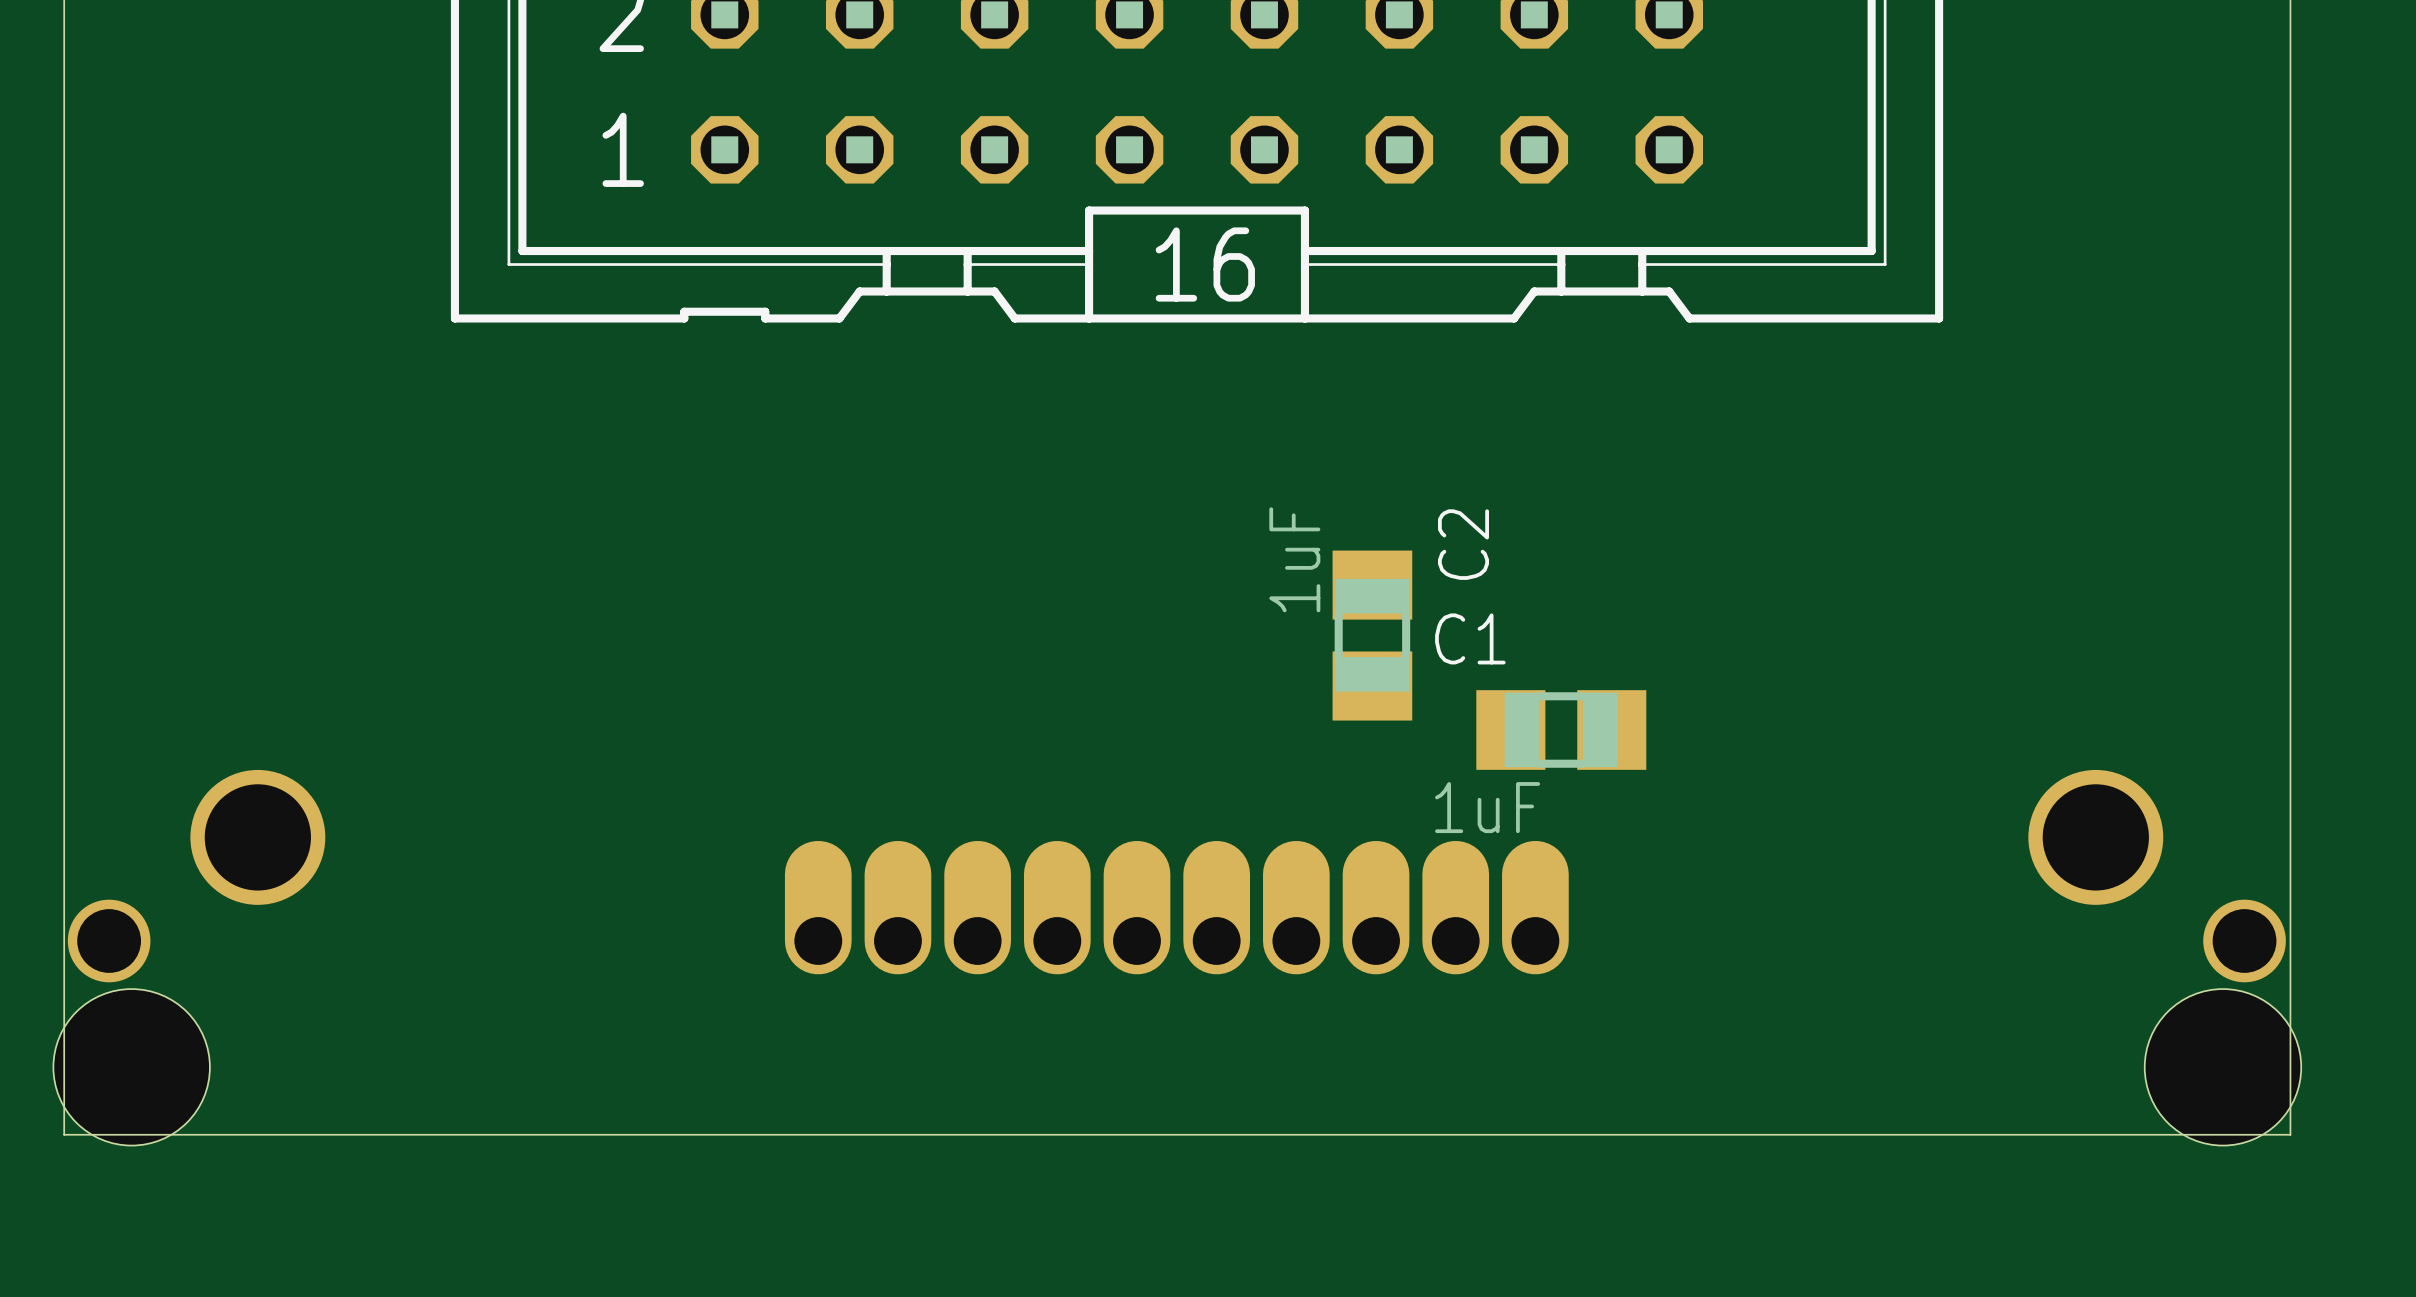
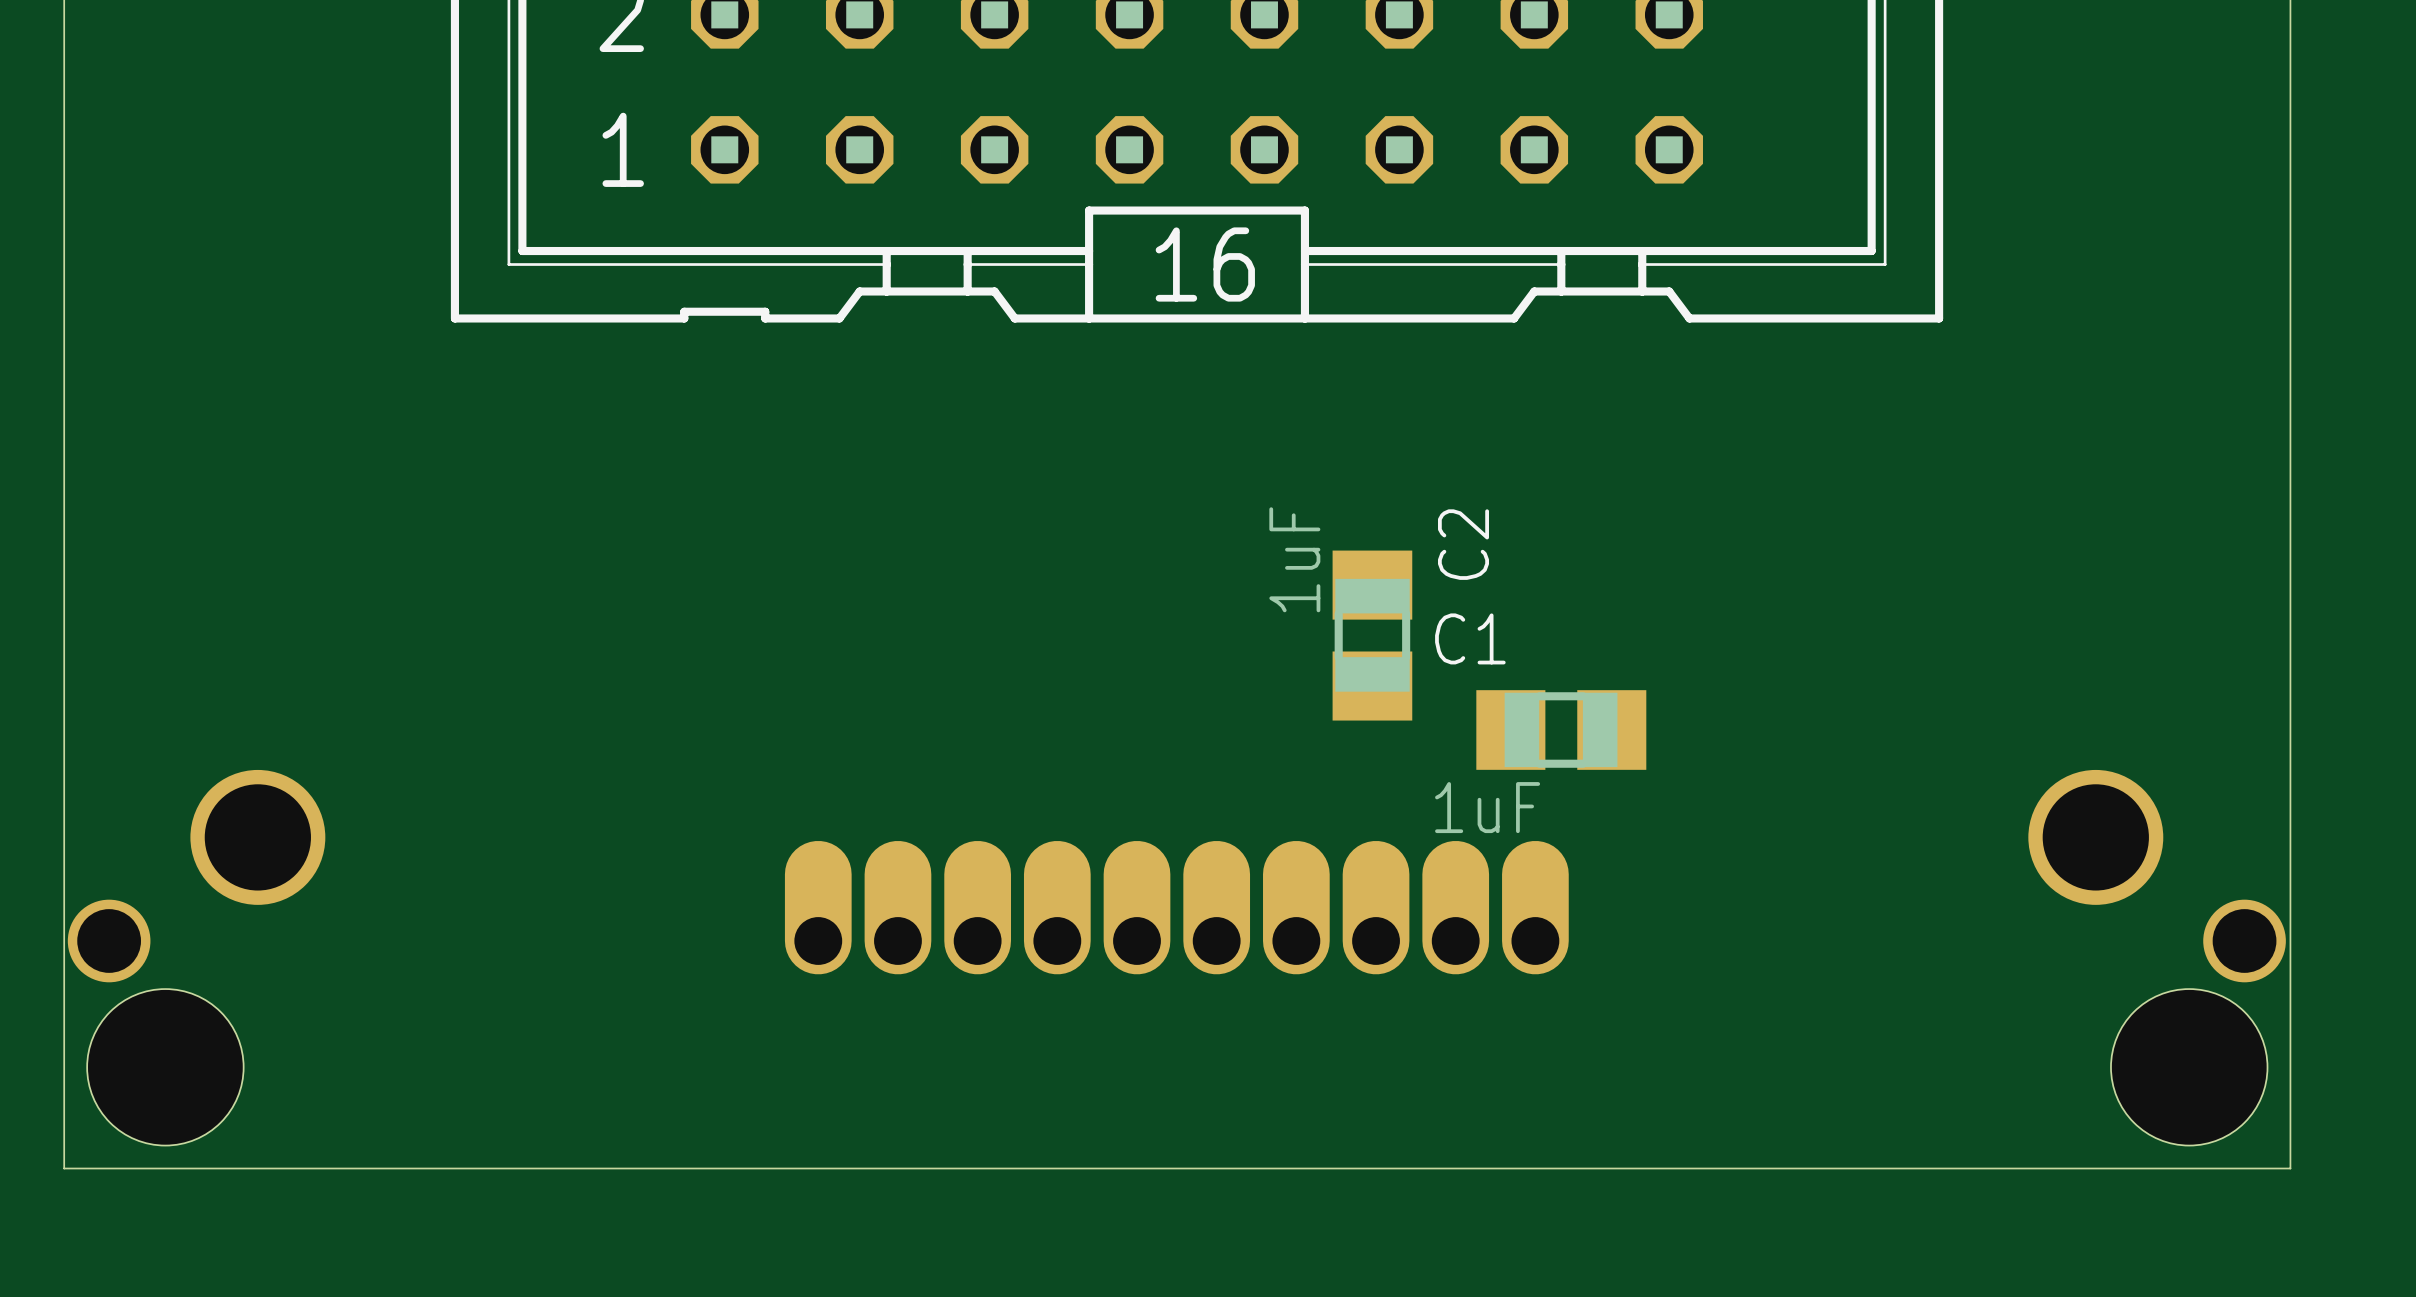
hole position: (131, 1067) -> (165, 1067)
hole position: (2222, 1067) -> (2189, 1067)
board edge: (64, 1134) (2290, 1134) -> (64, 1134) (64, 1168) (2290, 1168) (2290, 1134)

